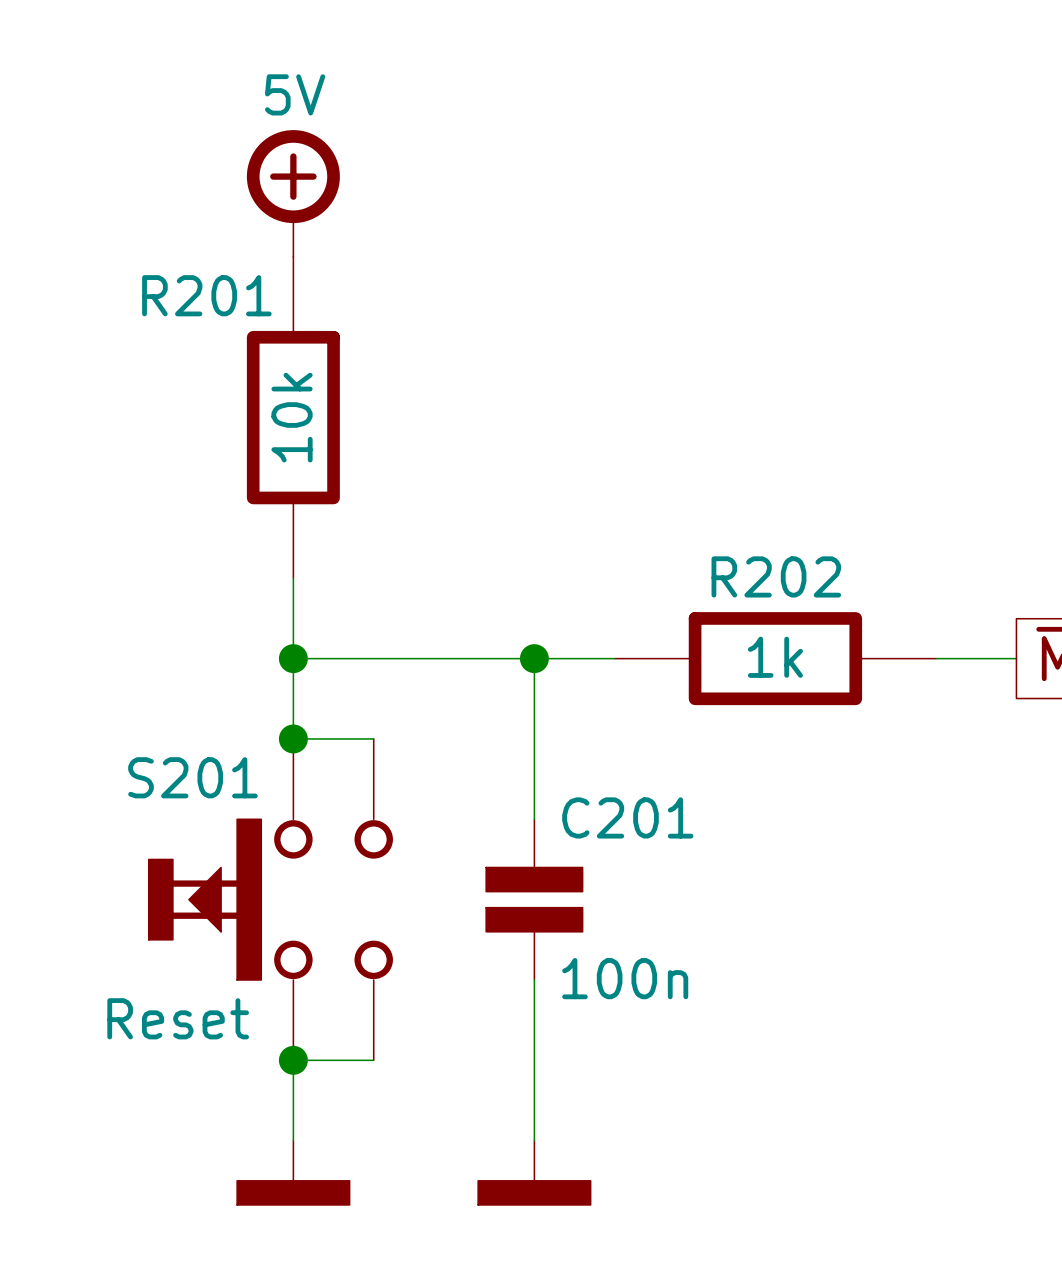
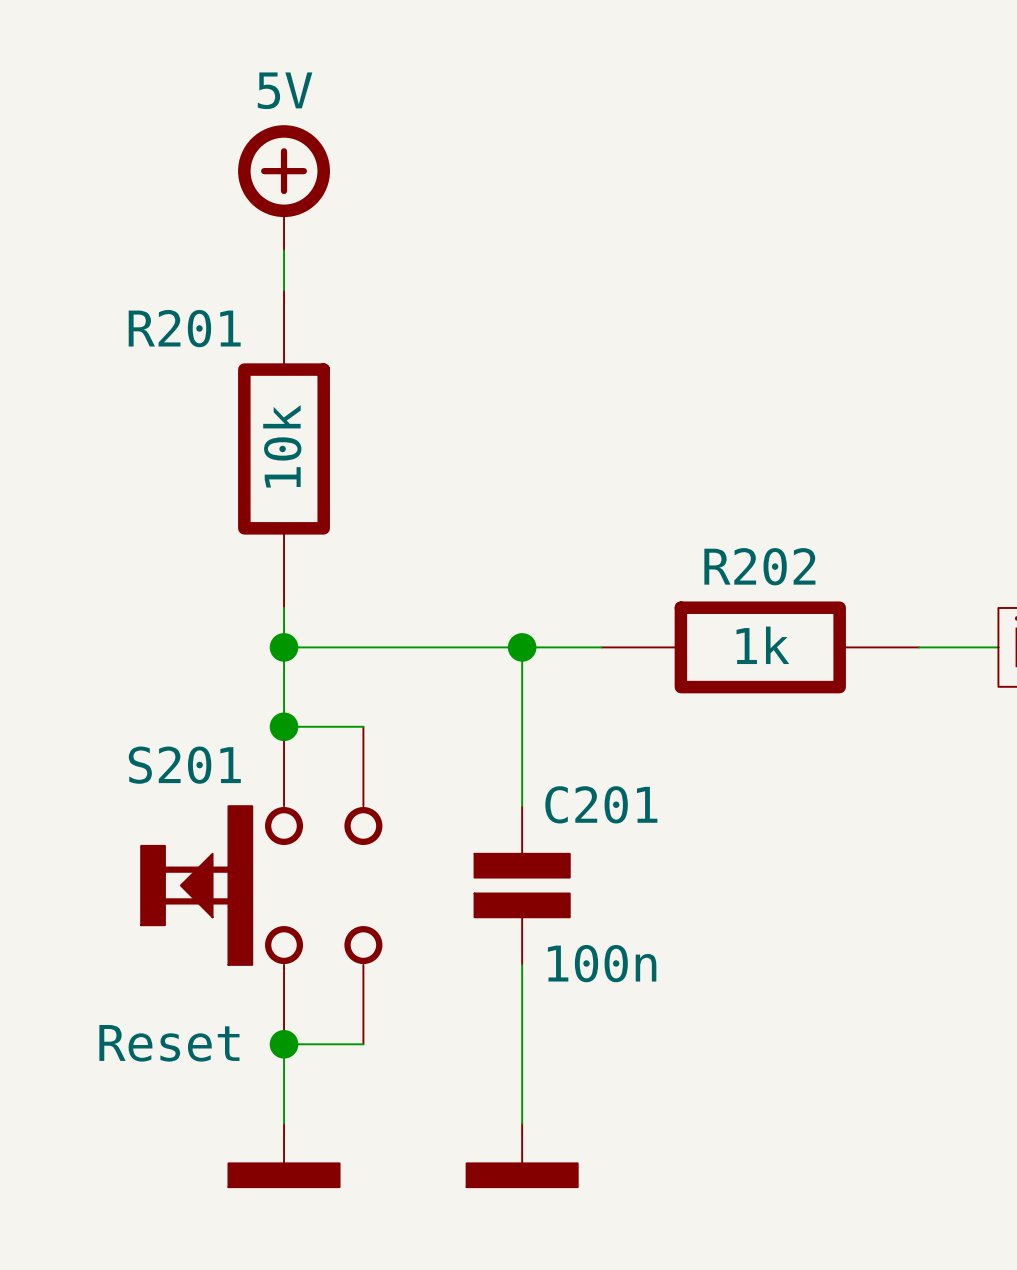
R201 position: (293, 417) -> (284, 448)
S201 value position: Reset (178, 1018) -> Reset (169, 1043)

